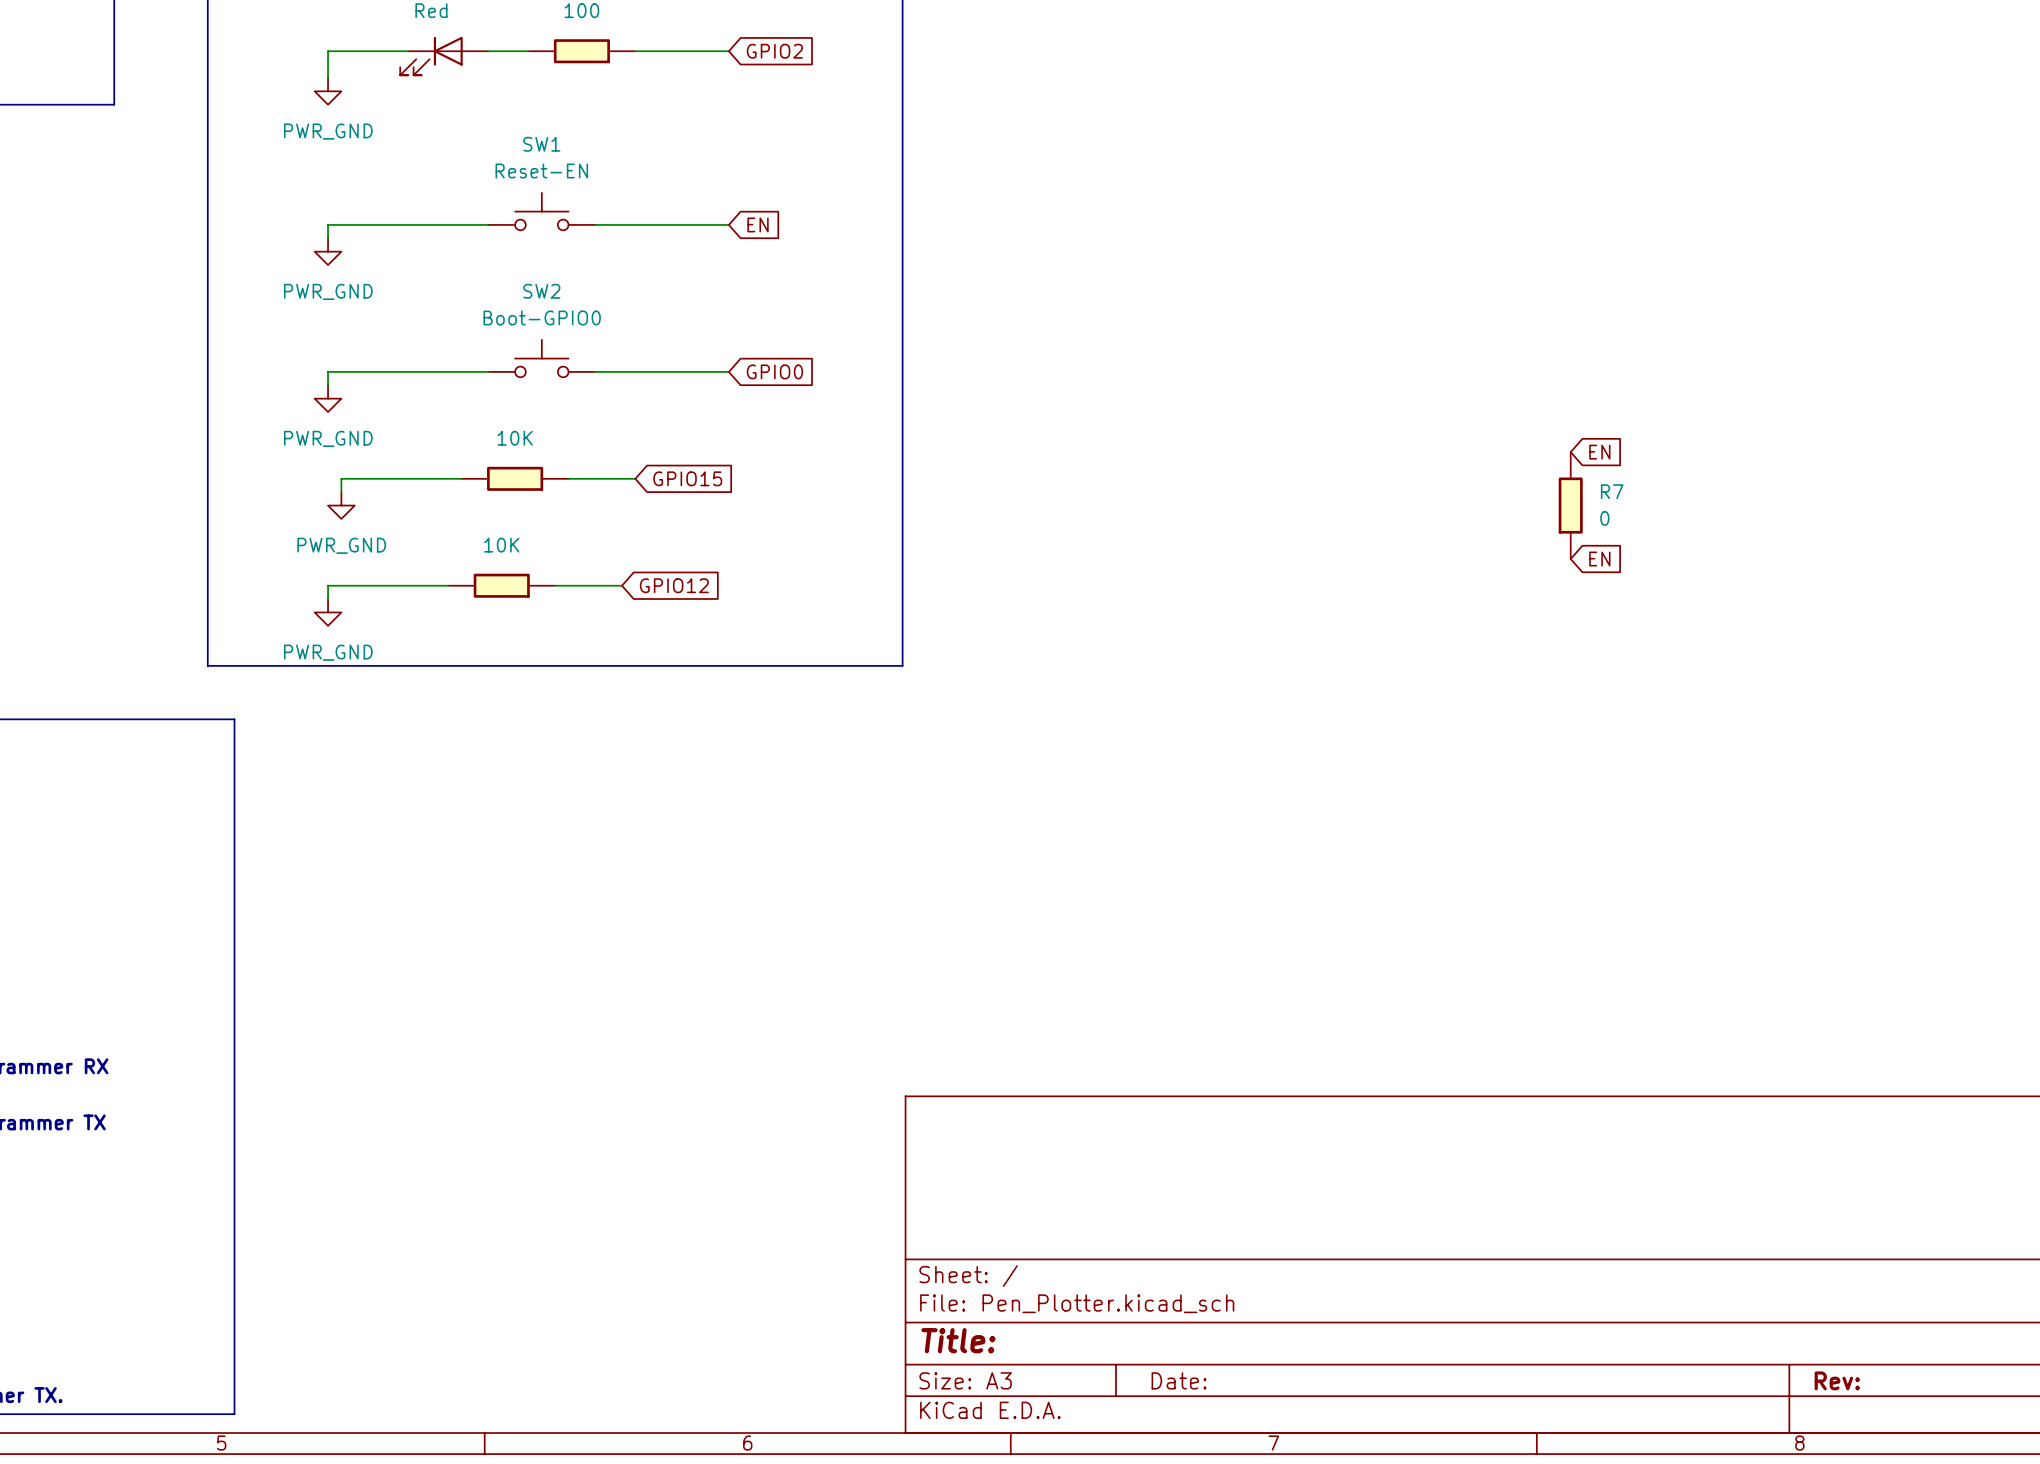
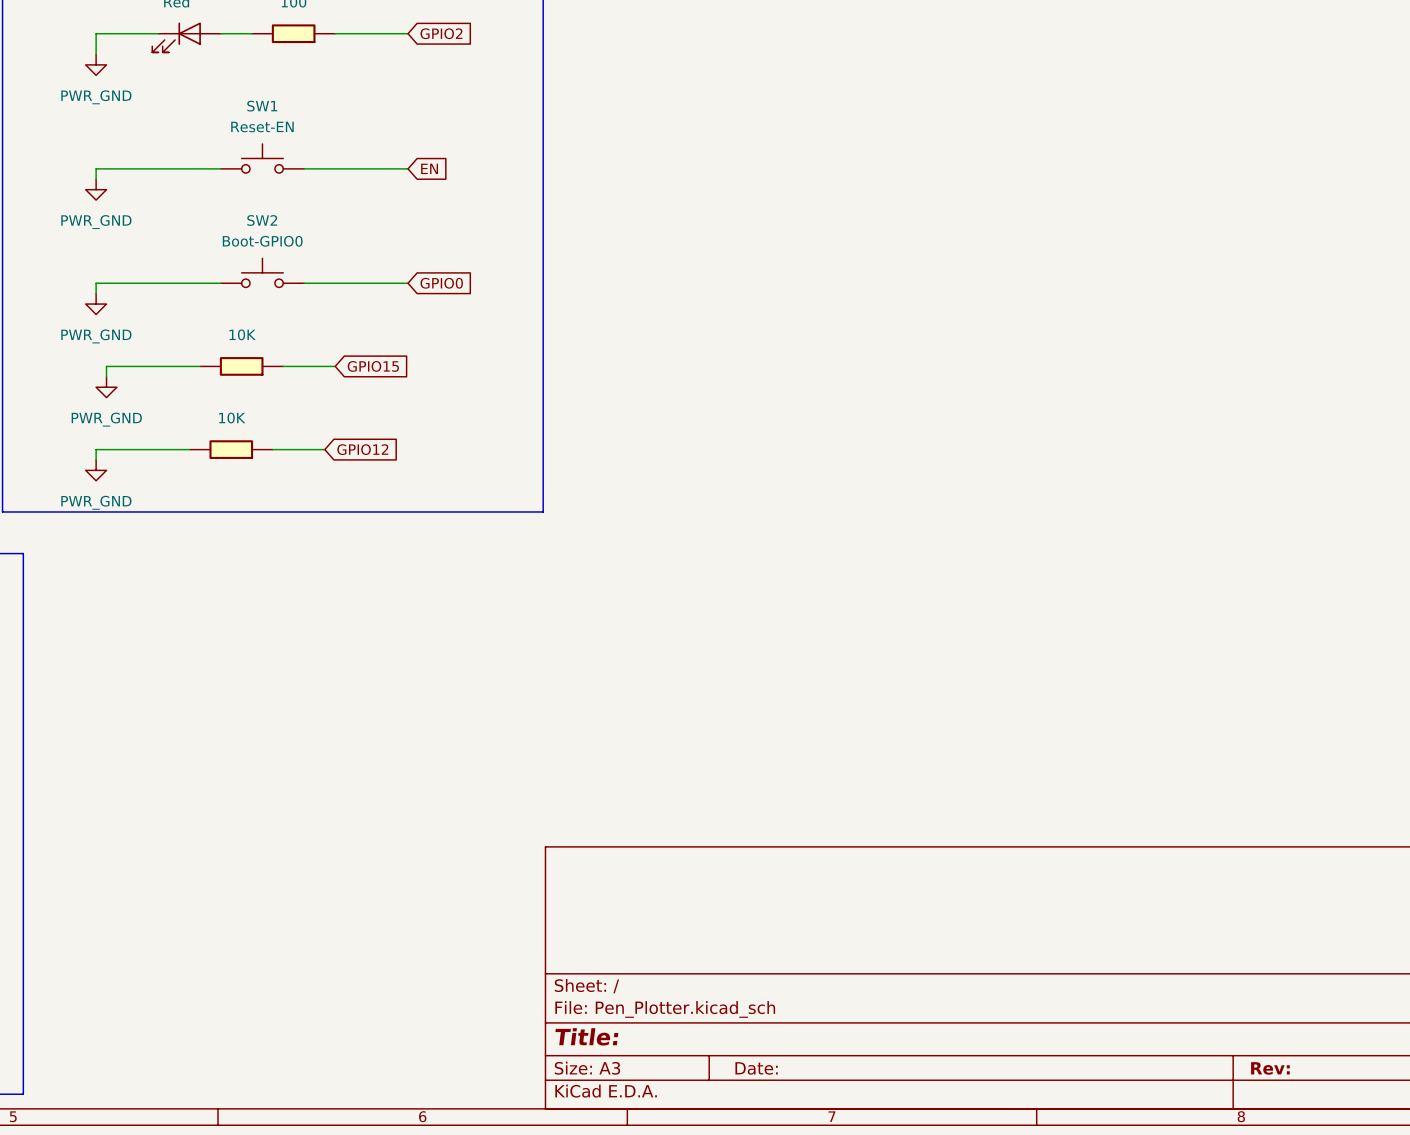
global label: EN (1599, 452) -> none
R7: 0 (1570, 505) -> none
global label: EN (1599, 559) -> none

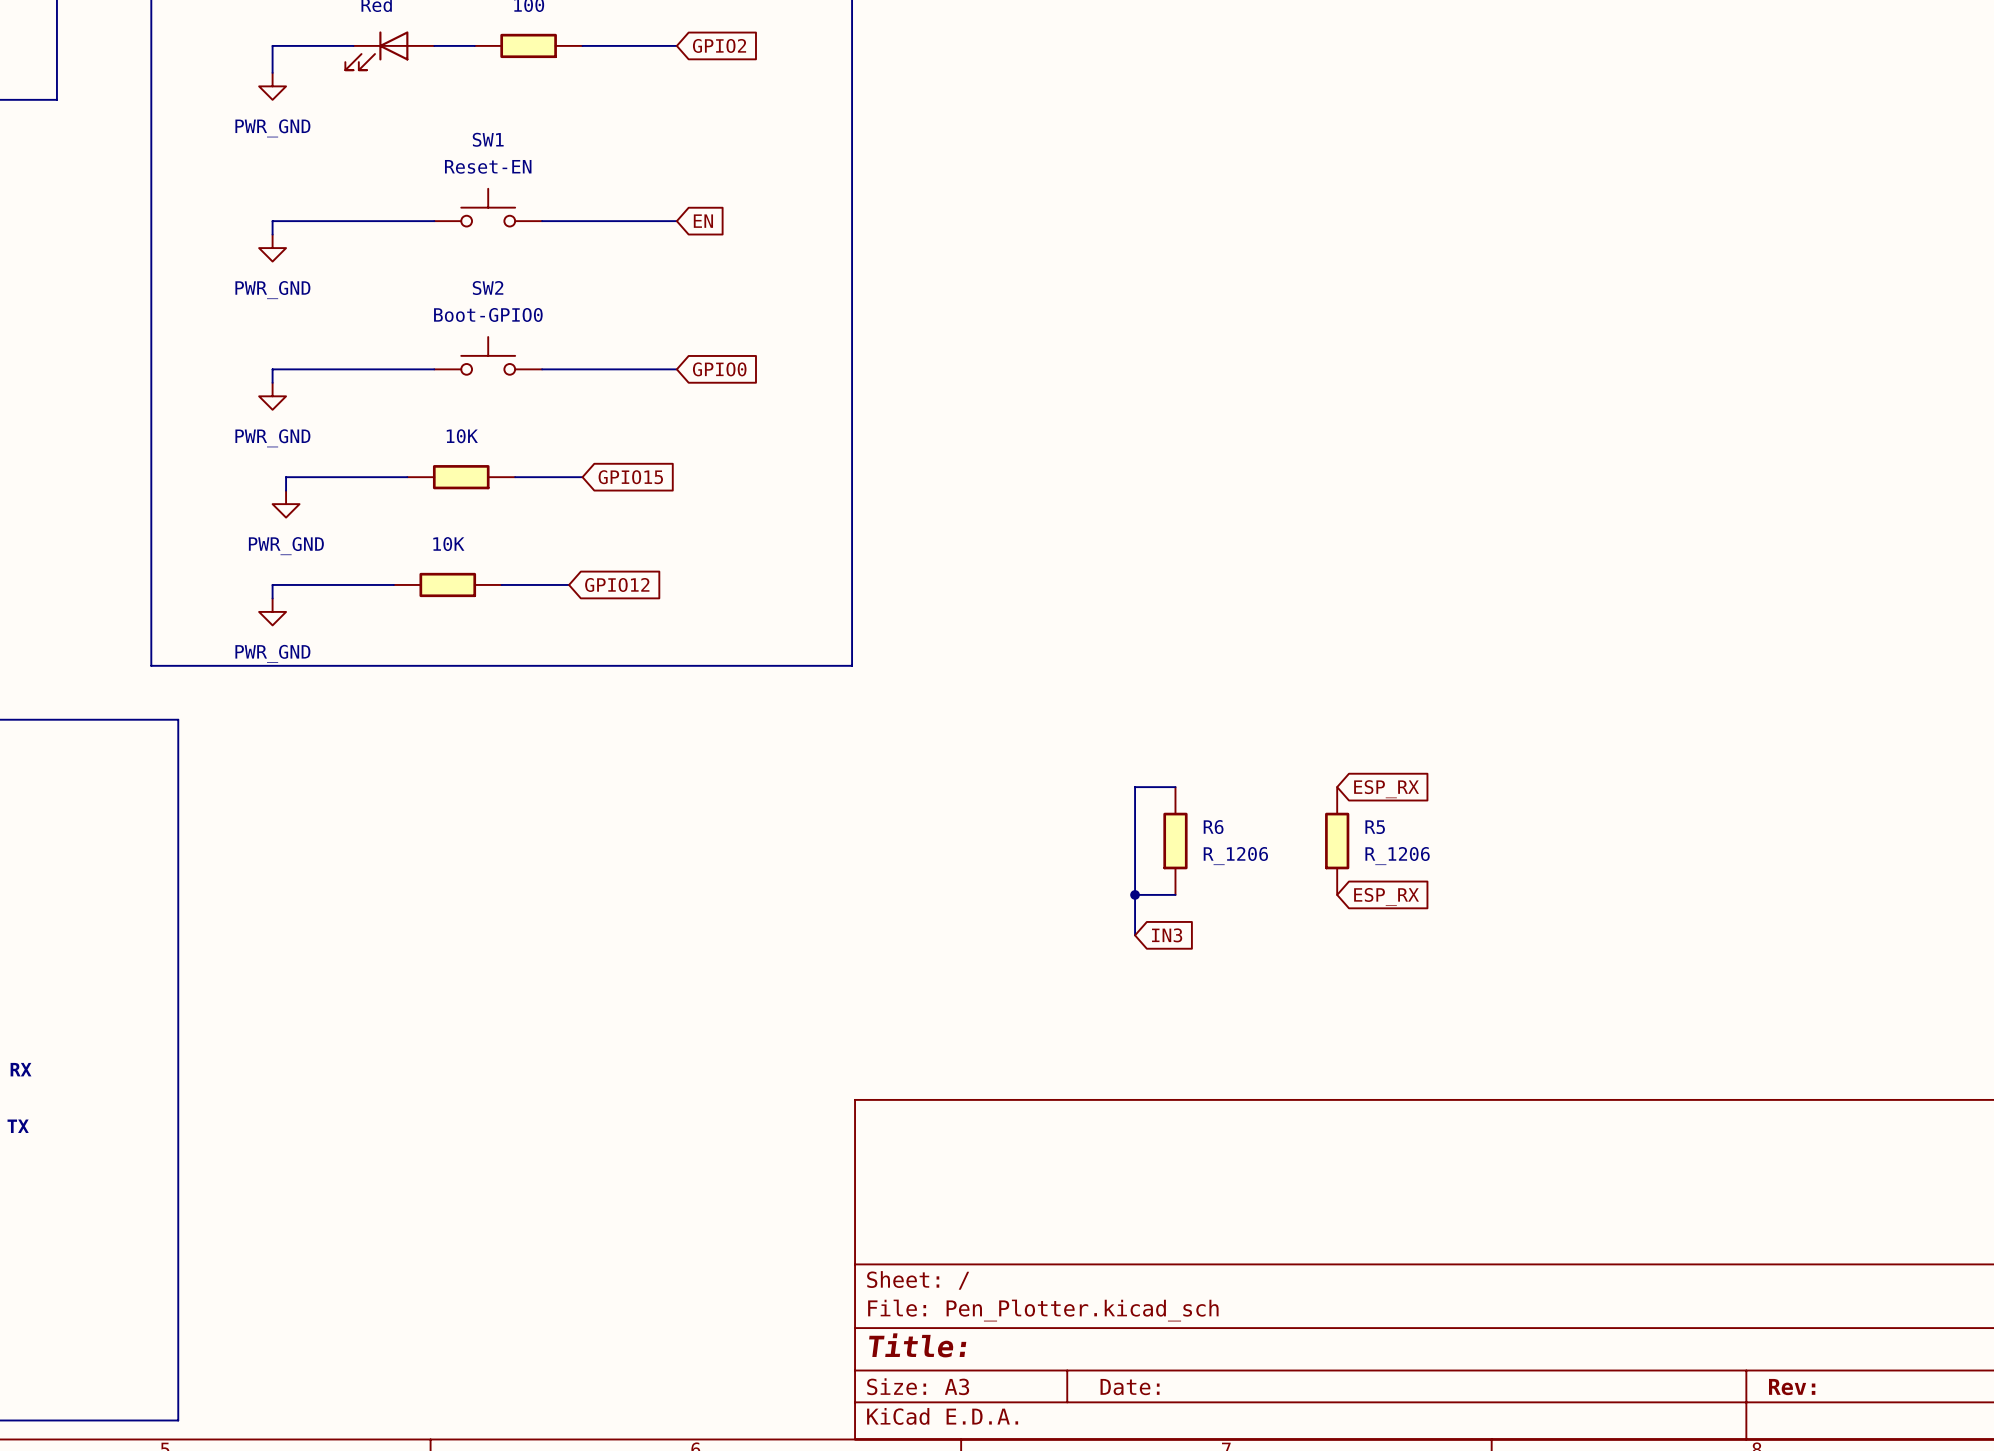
wire: none -> (1175, 787) (1135, 787) (1135, 935)
global label: none -> ESP_RX (1386, 789)
R6: none -> R_1206 (1175, 841)
R5: none -> R_1206 (1337, 841)
wire: none -> (1135, 894) (1175, 894)
junction: none -> (1135, 894)
global label: none -> ESP_RX (1386, 896)
global label: none -> IN3 (1167, 935)

